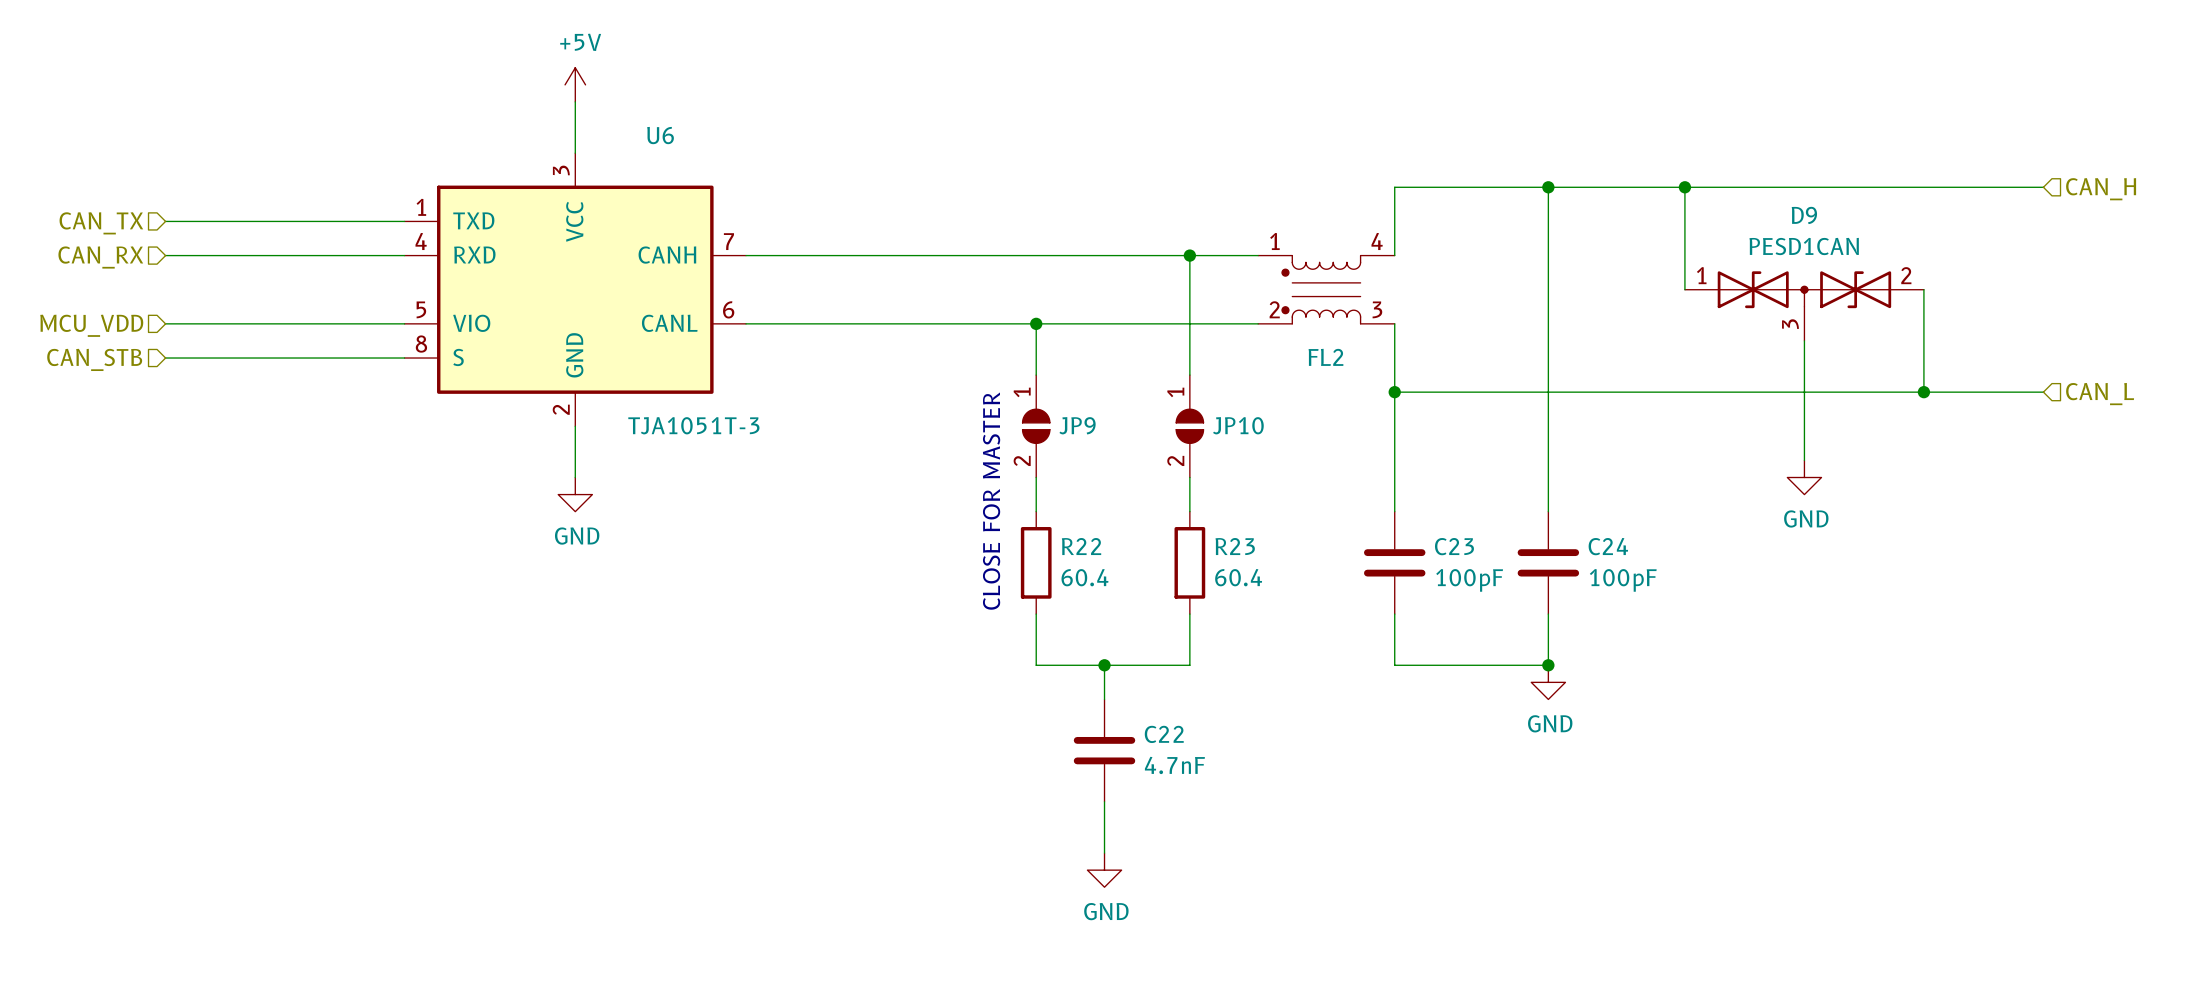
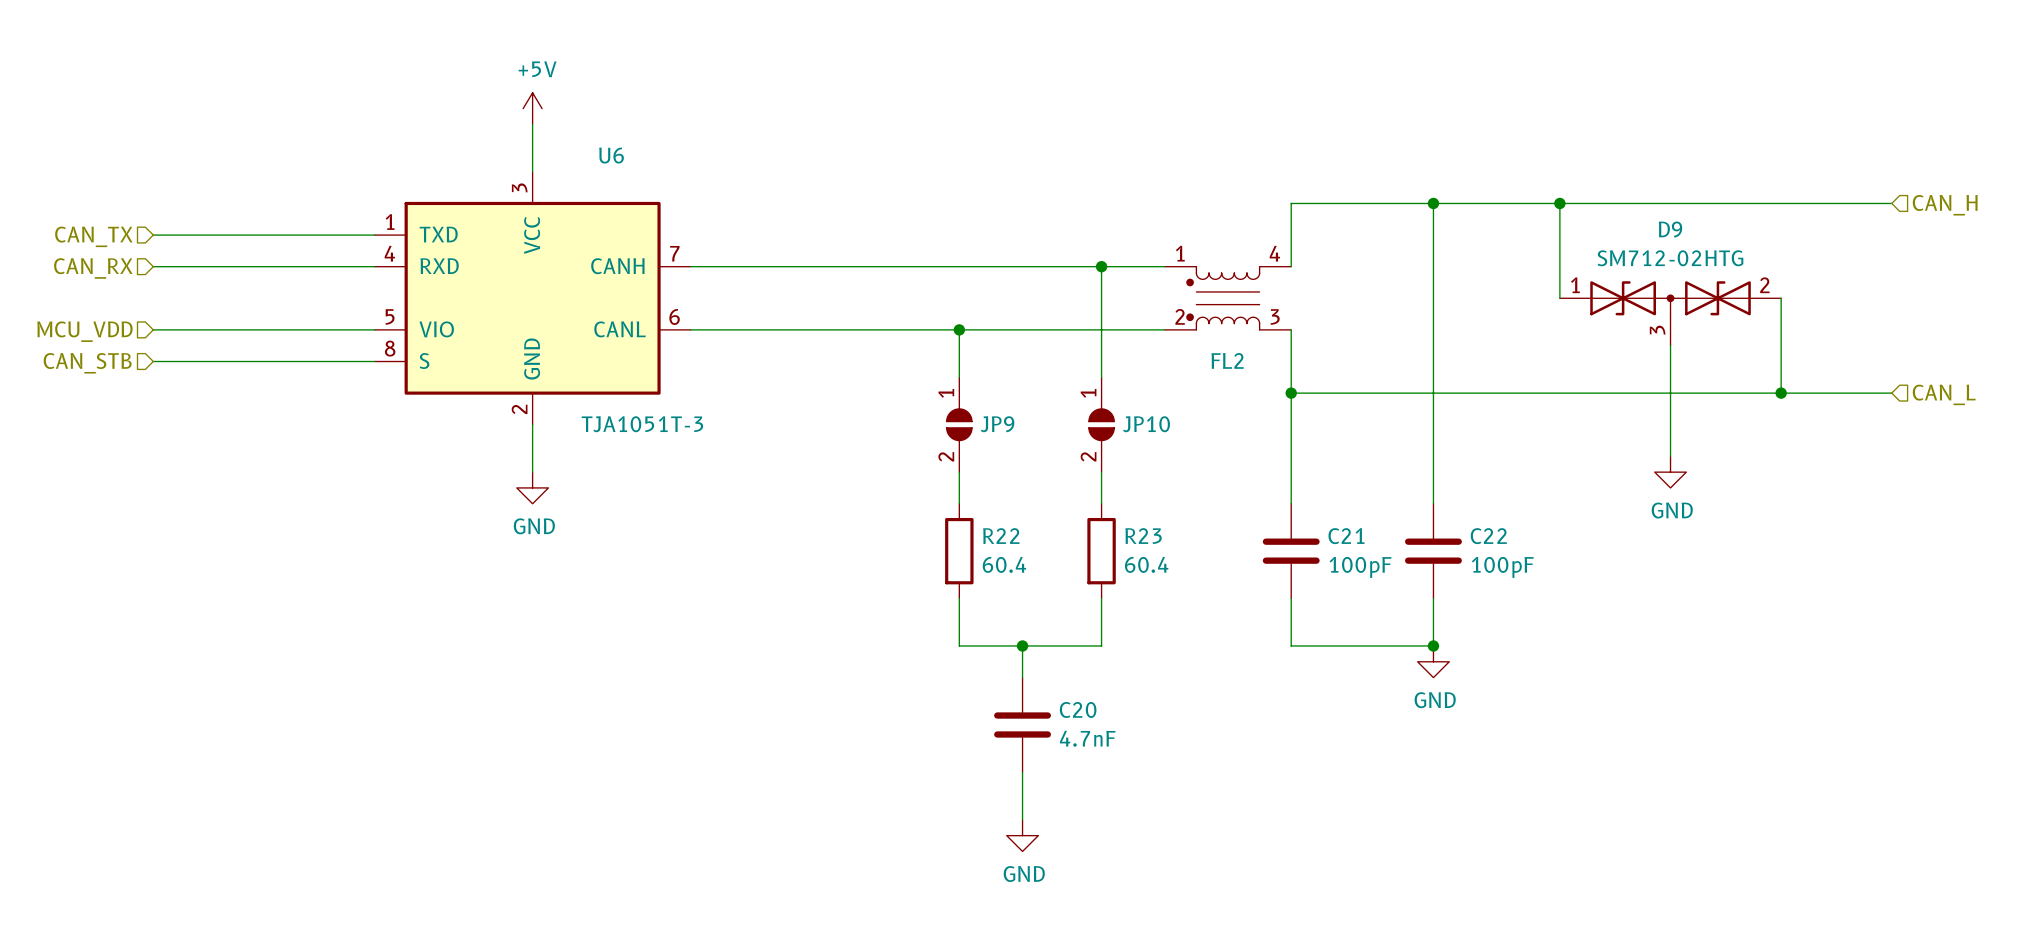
D9 value: PESD1CAN (1804, 246) -> SM712-02HTG (1670, 258)
text: CLOSE FOR MASTER (991, 501) -> none
C23 name: C23 (1454, 546) -> C21 (1346, 536)
C24 name: C24 (1608, 546) -> C22 (1488, 536)
C22 name: C22 (1164, 734) -> C20 (1078, 709)

